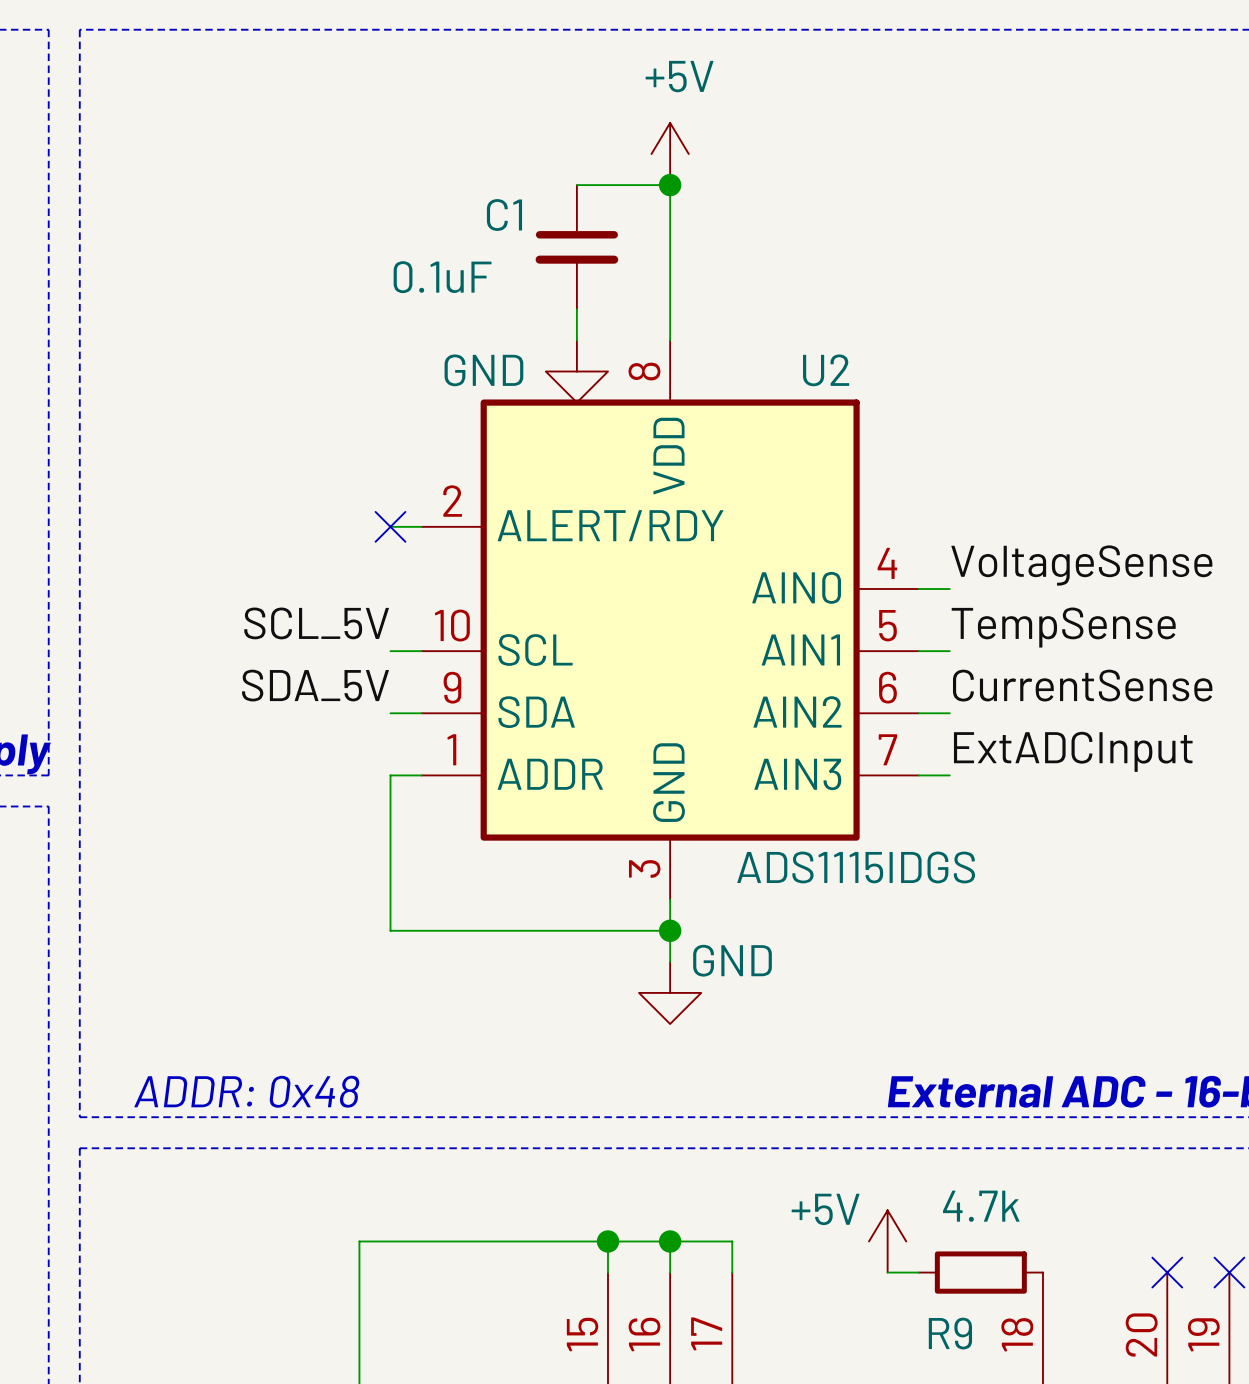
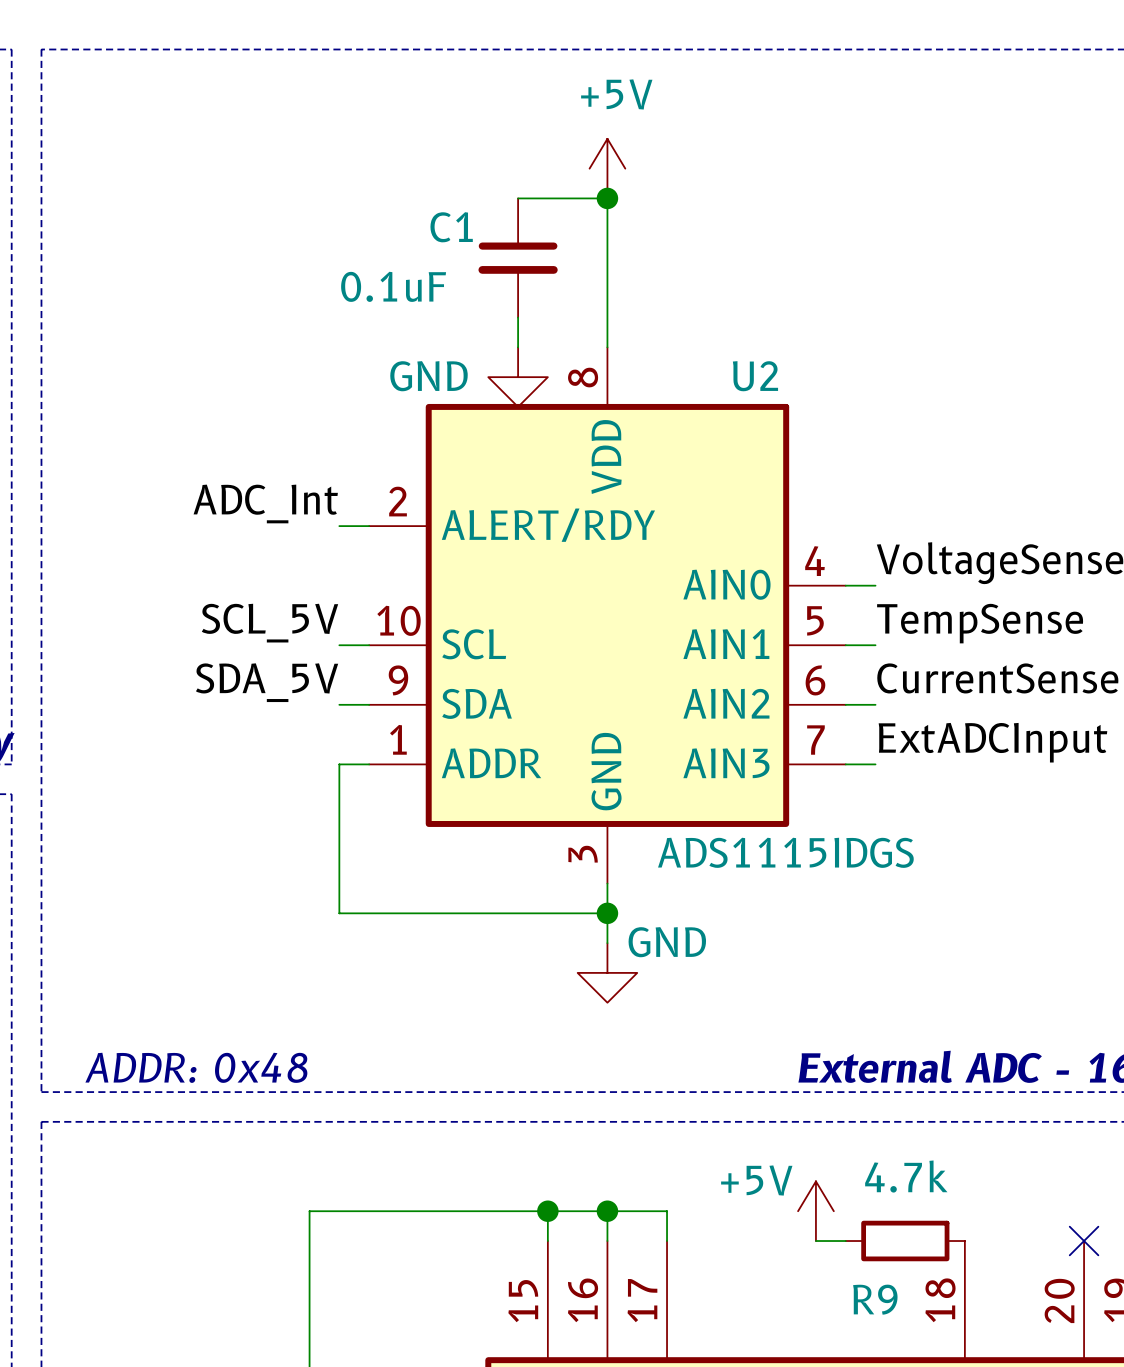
label: none -> ADC_Int (265, 503)
no-connect mark: (390, 526) -> none

